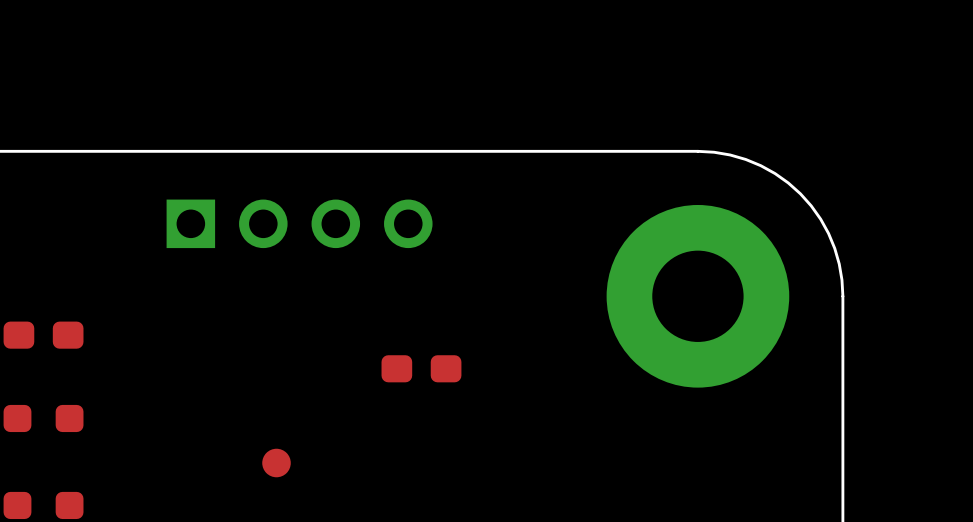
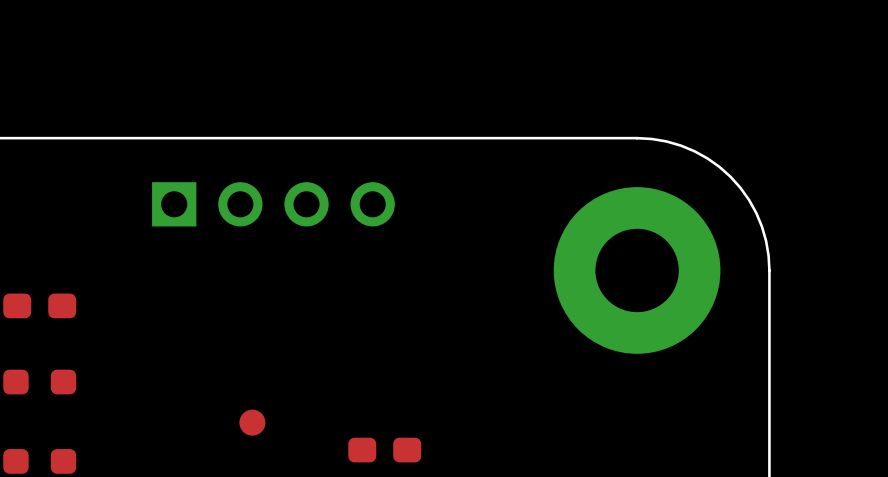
part position: (421, 368) -> (384, 450)

